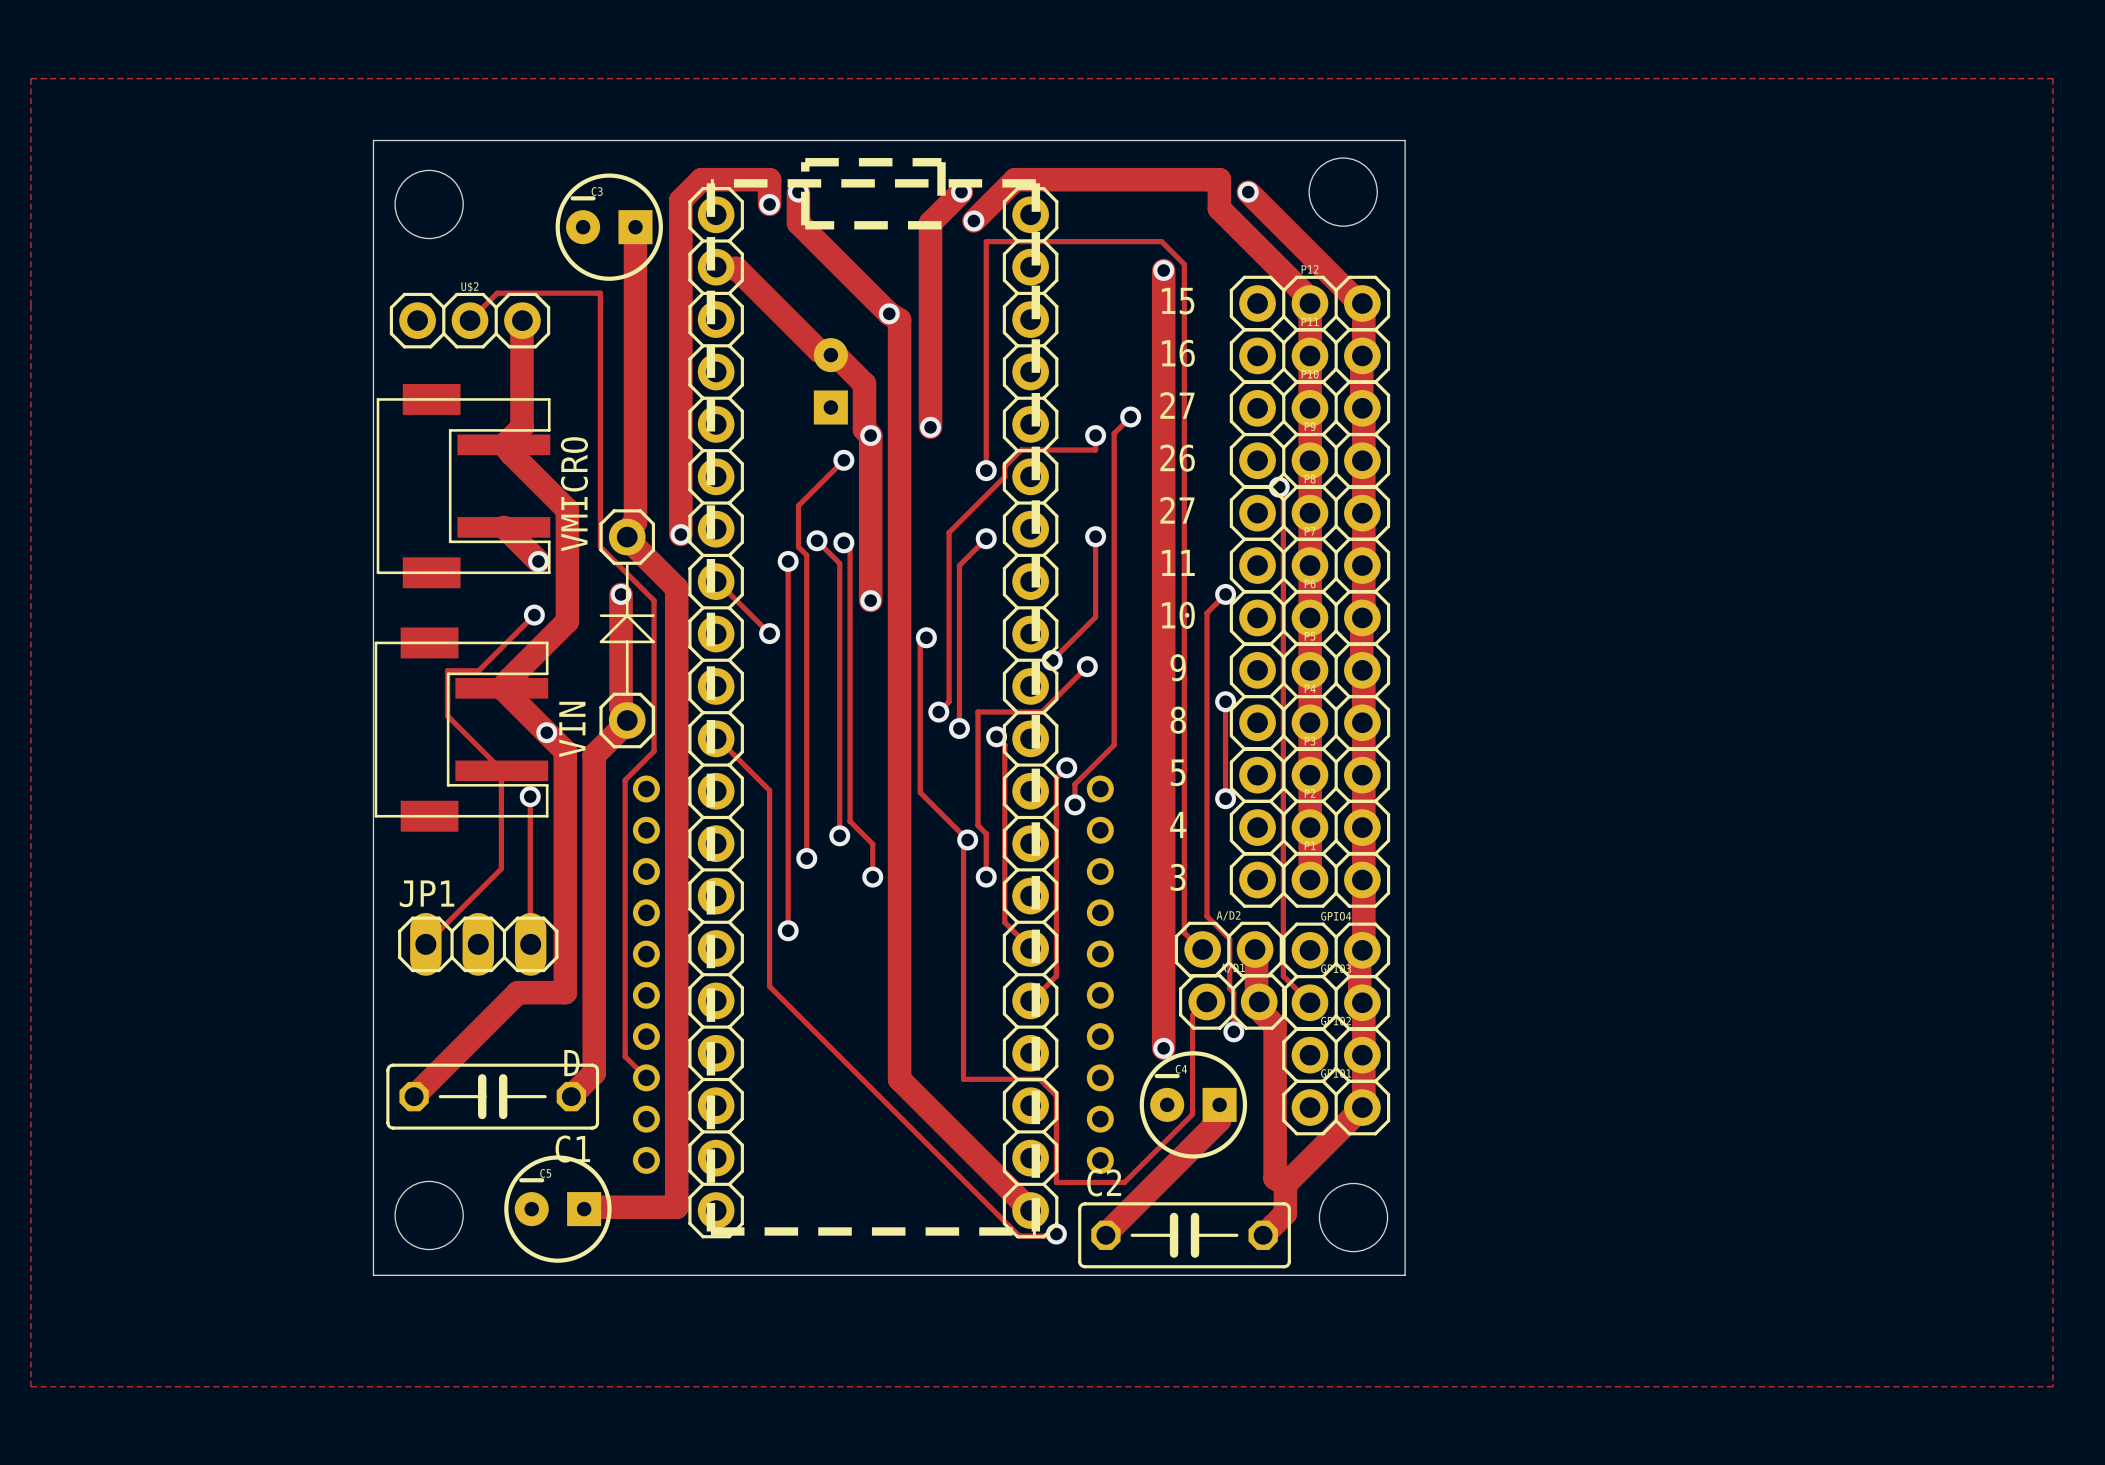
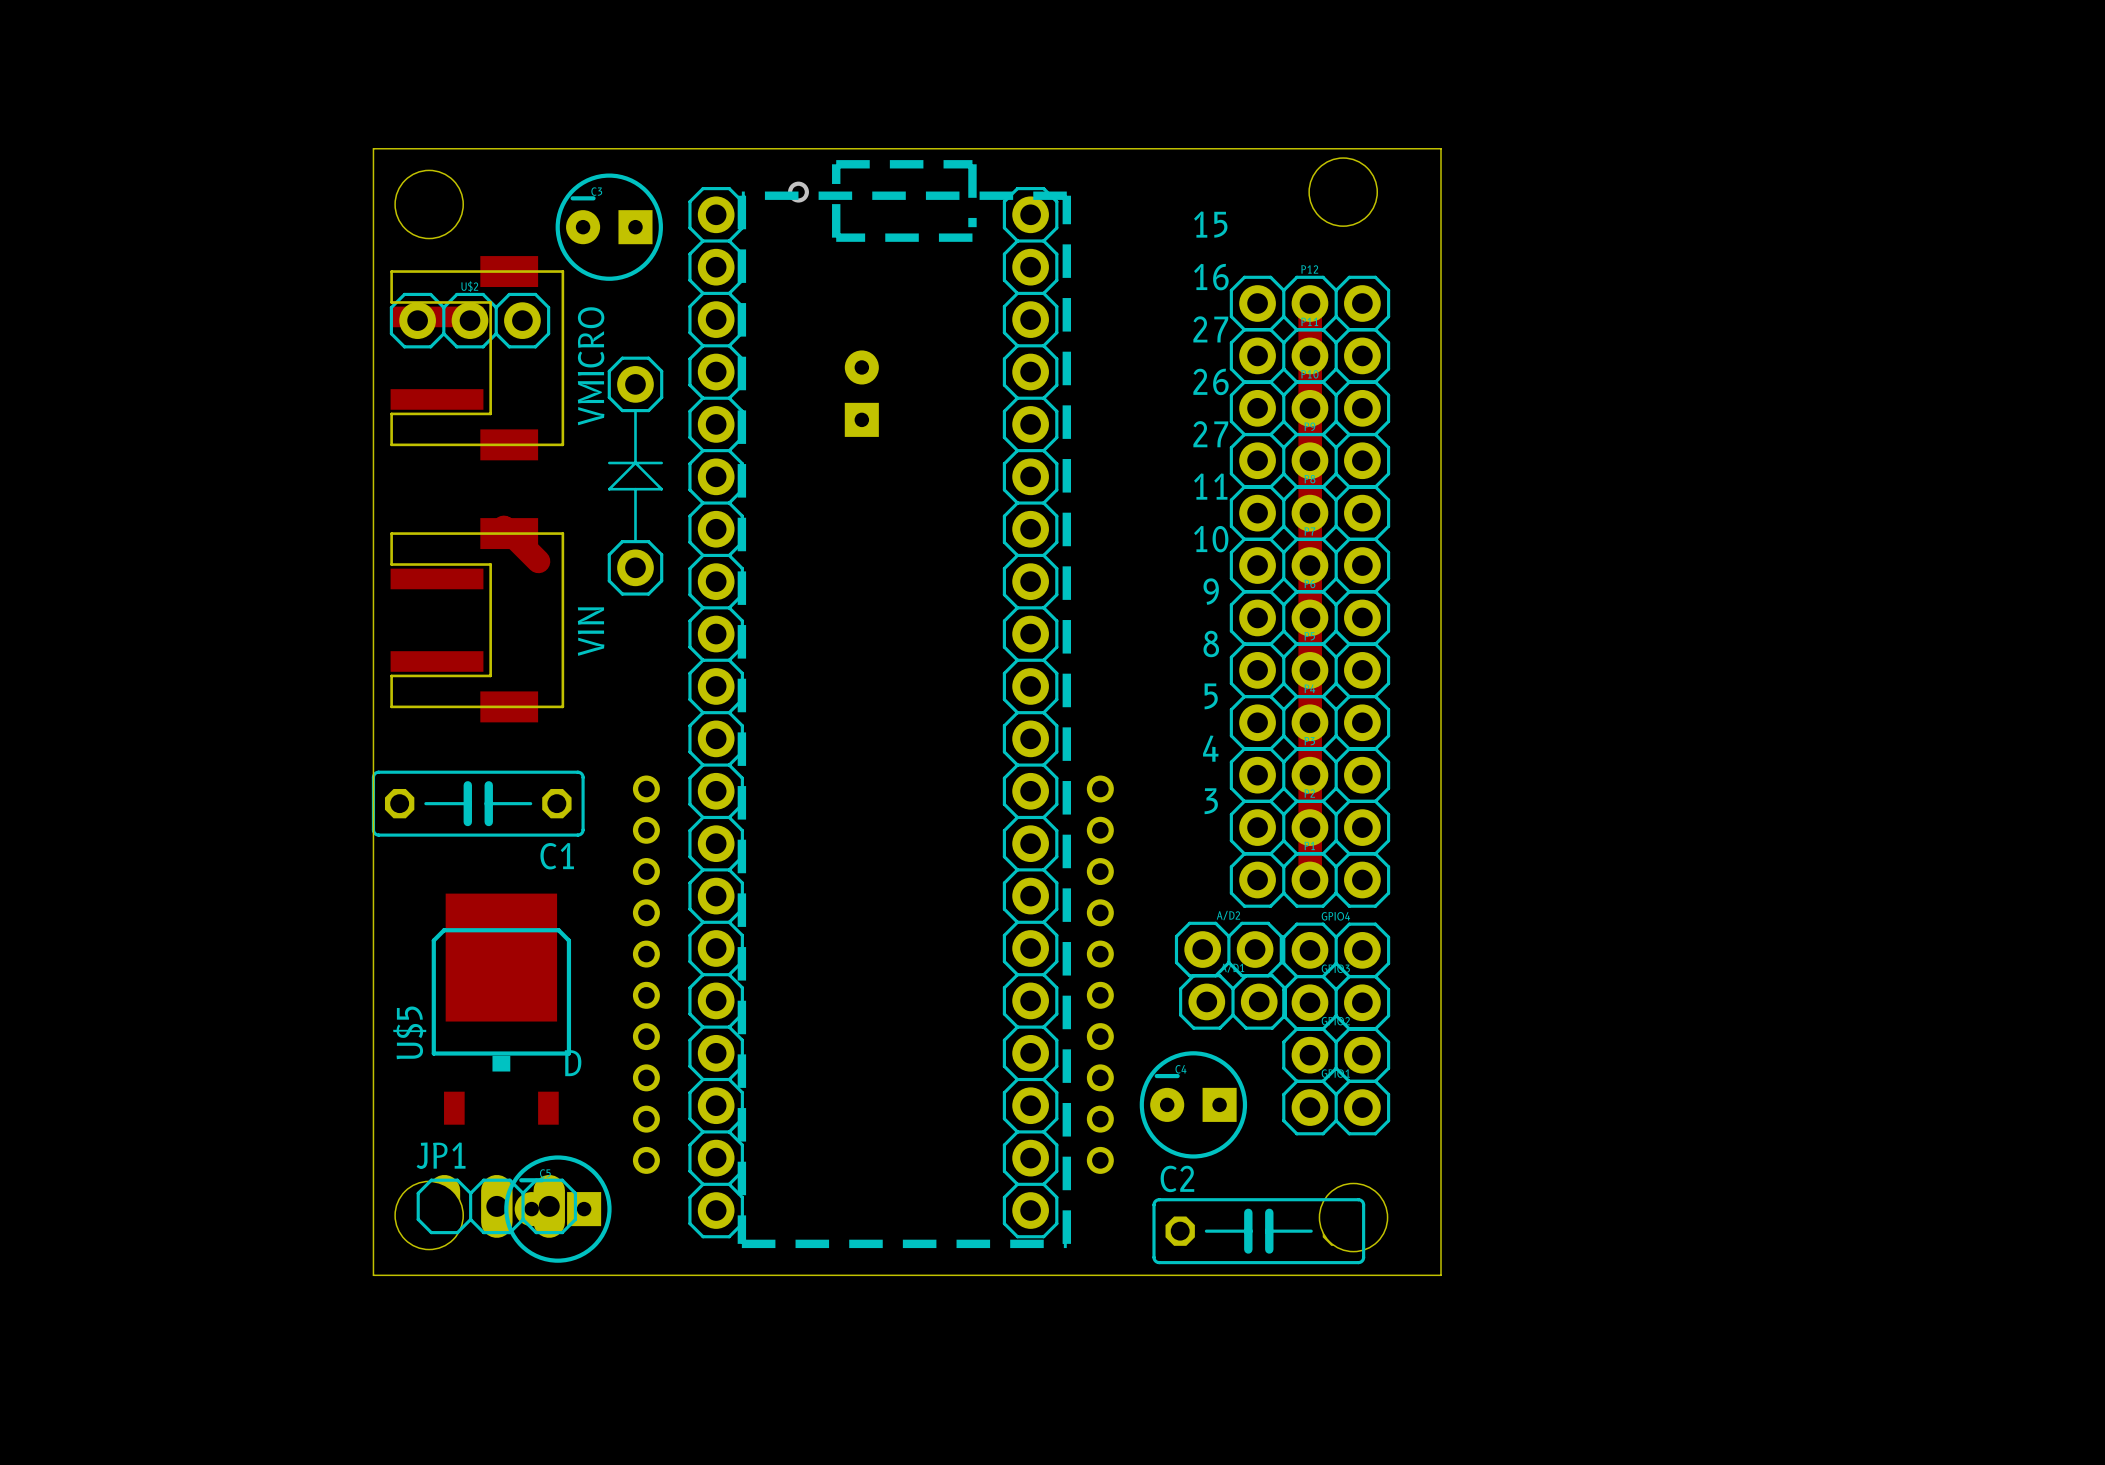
zone outline: (30, 78) (2052, 78) (2052, 1386) (30, 1386) (30, 78) -> none
board edge: (373, 148) (373, 140) (1405, 140) (1405, 1275) -> (373, 148) (1441, 148) (1441, 1275) (1405, 1275)
line: (710, 183) (1035, 183) (1035, 1231) (710, 1231) (710, 183) -> (741, 195) (1066, 195) (1066, 1243) (741, 1243) (741, 195)
track: (798, 192) (798, 223) (889, 313) (899, 320) (899, 1079) (1030, 1210) -> none
track: (961, 192) (930, 223) (930, 427) -> none
via: (961, 192) -> none
track: (1248, 192) (1353, 297) (1363, 303) (1363, 344) (1361, 357) (1361, 396) (1363, 408) (1363, 606) (1361, 619) (1361, 658) (1363, 670) (1363, 939) (1362, 950) (1359, 953) (1359, 990) (1363, 1002) (1363, 1095) (1362, 1107) (1285, 1184) -> none
via: (1248, 192) -> none
track: (769, 204) (769, 179) (701, 179) (680, 200) (680, 534) -> none
via: (769, 204) -> none
line: (941, 214) (941, 162) (805, 162) (805, 225) (941, 225) -> none
track: (973, 220) (1015, 179) (1219, 179) (1219, 208) (1303, 293) (1309, 303) -> none
via: (973, 220) -> none
track: (635, 227) (635, 522) (631, 526) (627, 538) (676, 588) (676, 1207) (585, 1207) (584, 1209) -> none
line: none -> (972, 227) (972, 164) (836, 164) (836, 237) (972, 237)
track: (716, 267) (736, 268) (819, 350) (835, 355) (864, 383) (864, 429) (870, 435) (870, 600) -> none
track: (1163, 270) (1163, 1048) -> none
via: (1163, 270) -> none
text position: 15 (1178, 301) -> 15 (1210, 224)
via: (889, 313) -> none
track: (470, 320) (497, 293) (600, 293) (600, 546) (654, 600) (654, 751) (625, 780) (625, 1056) (646, 1077) -> none
track: (522, 320) (522, 427) (503, 444) (567, 509) (567, 621) (501, 688) (565, 751) (565, 992) (517, 992) (414, 1096) -> none
text: none -> 27 (1210, 329)
text position: 16 (1178, 353) -> 16 (1211, 277)
part: none -> (477, 358)
part position: (830, 381) -> (861, 393)
text position: 27 (1177, 405) -> 27 (1210, 434)
track: (1130, 416) (1114, 433) (1114, 745) (1074, 784) (1074, 804) -> none
via: (1130, 416) -> none
via: (930, 427) -> none
via: (870, 435) -> none
track: (1095, 435) (1095, 450) (1021, 450) (1004, 466) (1004, 476) (949, 532) (949, 701) (938, 712) -> none
via: (1095, 435) -> none
text position: 26 (1177, 458) -> 26 (1211, 381)
track: (843, 460) (798, 505) (798, 546) (806, 555) (806, 858) -> none
via: (843, 460) -> none
track: (986, 470) (986, 241) (1161, 241) (1184, 264) (1184, 932) (1202, 949) -> none
via: (986, 470) -> none
part: (463, 486) -> none
track: (1279, 487) (1283, 491) (1283, 976) (1309, 1002) -> none
via: (1279, 487) -> none
text position: VMICRO (574, 494) -> VMICRO (591, 366)
text: 27 (1177, 510) -> none
via: (680, 534) -> none
track: (1095, 536) (1095, 617) (1052, 660) -> none
via: (1095, 536) -> none
track: (986, 538) (959, 565) (959, 728) -> none
via: (986, 538) -> none
track: (817, 540) (839, 563) (839, 835) -> none
via: (817, 540) -> none
track: (843, 542) (850, 549) (850, 821) (872, 844) (872, 877) -> none
via: (843, 542) -> none
via: (538, 561) -> none
track: (788, 561) (788, 930) -> none
via: (788, 561) -> none
text position: 11 (1178, 562) -> 11 (1210, 486)
track: (716, 581) (769, 633) -> none
track: (621, 594) (621, 707) (627, 722) (594, 755) (594, 1073) (571, 1096) -> none
via: (621, 594) -> none
track: (1225, 594) (1207, 613) (1207, 916) (1229, 939) (1229, 988) (1233, 992) (1233, 1031) -> none
via: (1225, 594) -> none
via: (870, 600) -> none
track: (534, 615) (478, 670) (447, 670) (447, 716) (501, 770) (501, 868) (425, 944) -> none
via: (534, 615) -> none
text position: 10 (1178, 615) -> 10 (1211, 539)
part: none -> (477, 620)
part position: (627, 628) -> (635, 476)
via: (769, 633) -> none
track: (926, 637) (920, 643) (920, 792) (967, 839) (963, 837) (963, 1079) (1039, 1079) (1056, 1095) (1056, 1182) (1124, 1182) (1192, 1114) (1192, 1015) (1206, 1001) -> none
via: (926, 637) -> none
via: (1052, 660) -> none
track: (1087, 666) (1041, 712) (977, 712) (977, 825) (986, 833) (986, 877) -> none
via: (1087, 666) -> none
text position: 9 (1178, 667) -> 9 (1211, 591)
track: (1225, 701) (1225, 798) -> none
via: (1225, 701) -> none
via: (938, 712) -> none
text position: 8 (1178, 720) -> 8 (1211, 643)
via: (959, 728) -> none
part: (461, 729) -> none
text position: VIN (572, 729) -> VIN (591, 631)
via: (546, 732) -> none
track: (996, 736) (1004, 745) (1004, 922) (1030, 948) -> none
via: (996, 736) -> none
track: (716, 738) (769, 790) (769, 986) (1019, 1236) (1056, 1236) (1056, 1234) -> none
track: (1066, 767) (1056, 778) (1056, 976) (1030, 1000) -> none
via: (1066, 767) -> none
text position: 5 (1178, 772) -> 5 (1211, 696)
track: (530, 796) (530, 944) -> none
via: (530, 796) -> none
via: (1225, 798) -> none
via: (1074, 804) -> none
text position: 4 (1178, 824) -> 4 (1210, 748)
via: (839, 835) -> none
via: (967, 839) -> none
via: (806, 858) -> none
via: (872, 877) -> none
via: (986, 877) -> none
text position: 3 (1178, 877) -> 3 (1211, 801)
via: (788, 930) -> none
JP1 position: (478, 944) -> (496, 1206)
track: (1255, 949) (1256, 998) (1262, 1013) (1275, 1025) (1275, 1178) (1285, 1184) -> none
U$5: none -> (501, 1009)
via: (1233, 1031) -> none
via: (1163, 1048) -> none
C1 position: (492, 1096) -> (478, 803)
track: (1219, 1104) (1219, 1120) (1105, 1235) -> none
track: (1285, 1184) (1285, 1213) (1263, 1235) -> none
via: (1056, 1234) -> none
C2 position: (1184, 1235) -> (1258, 1231)

